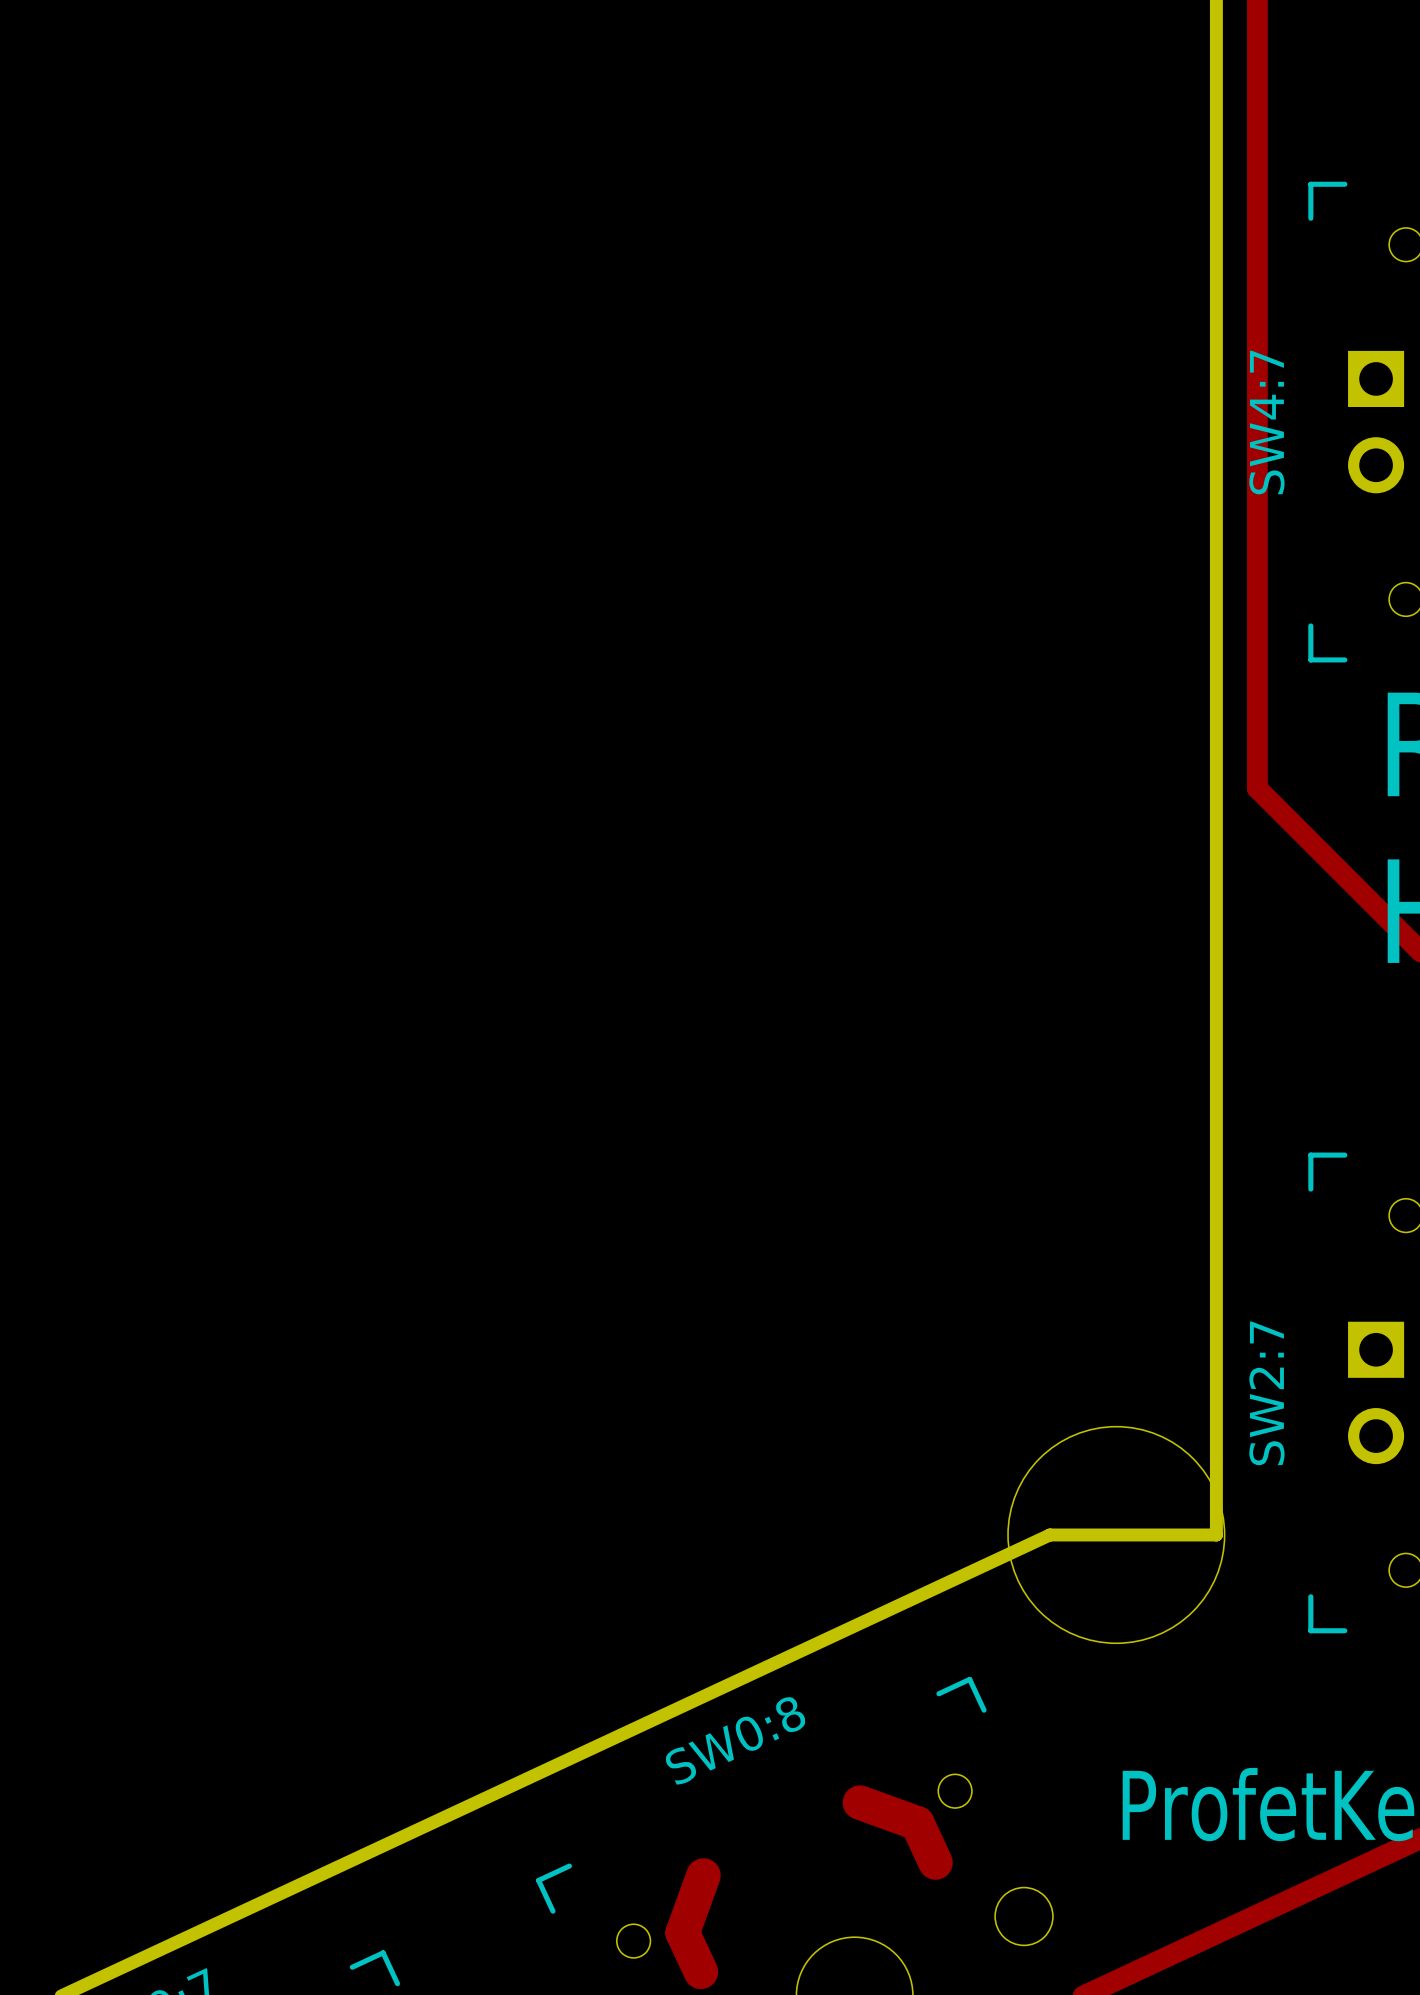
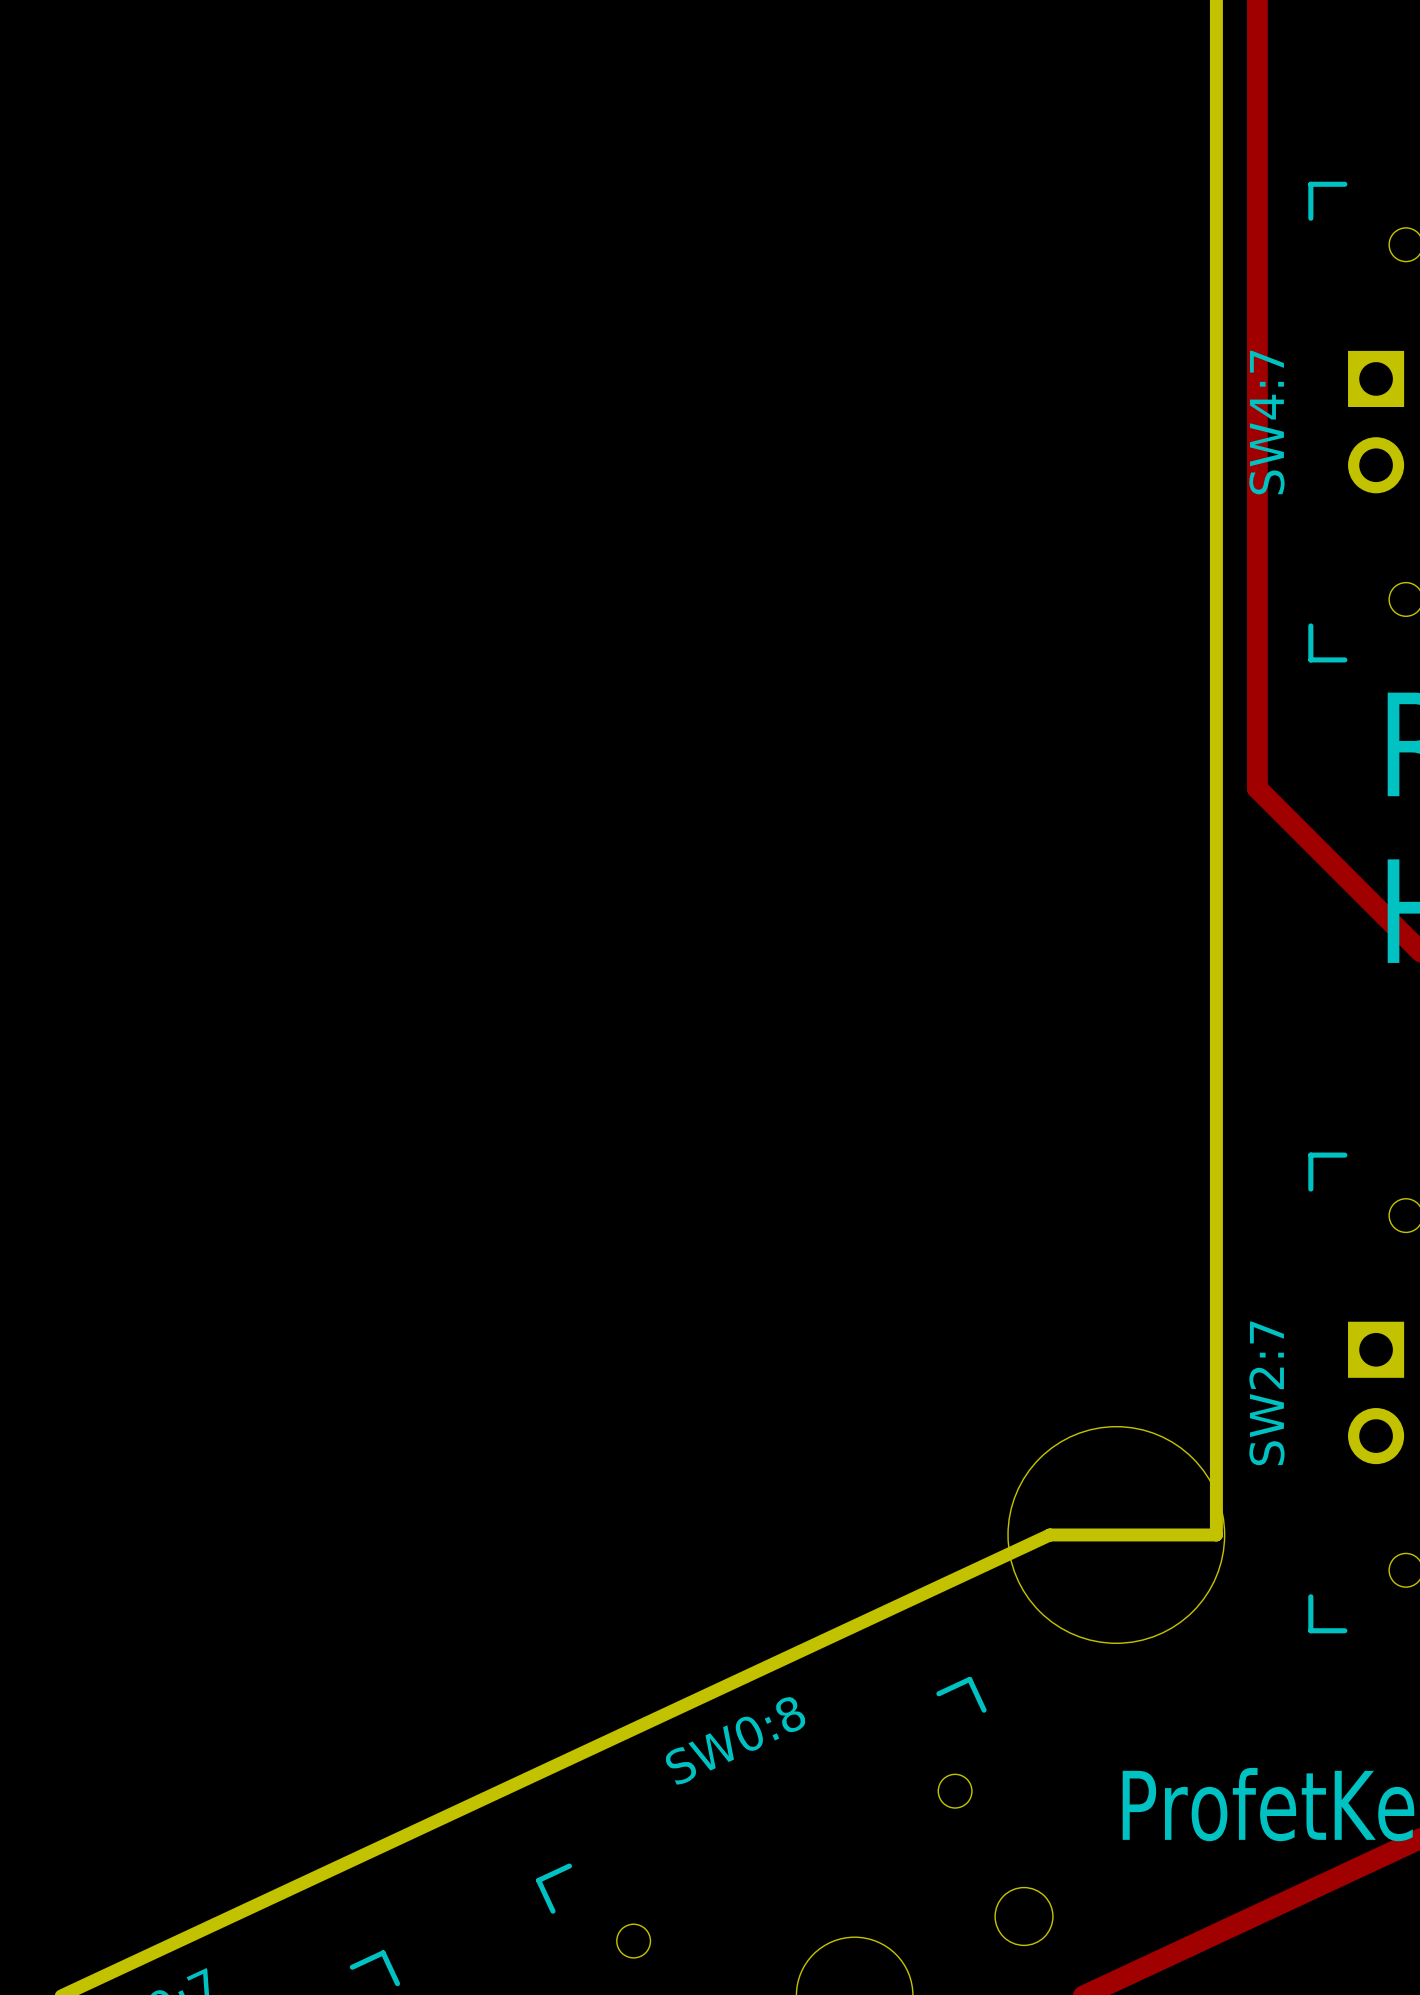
track: (859, 1802) (917, 1823) (935, 1862) -> none
track: (703, 1875) (682, 1932) (700, 1971) -> none

